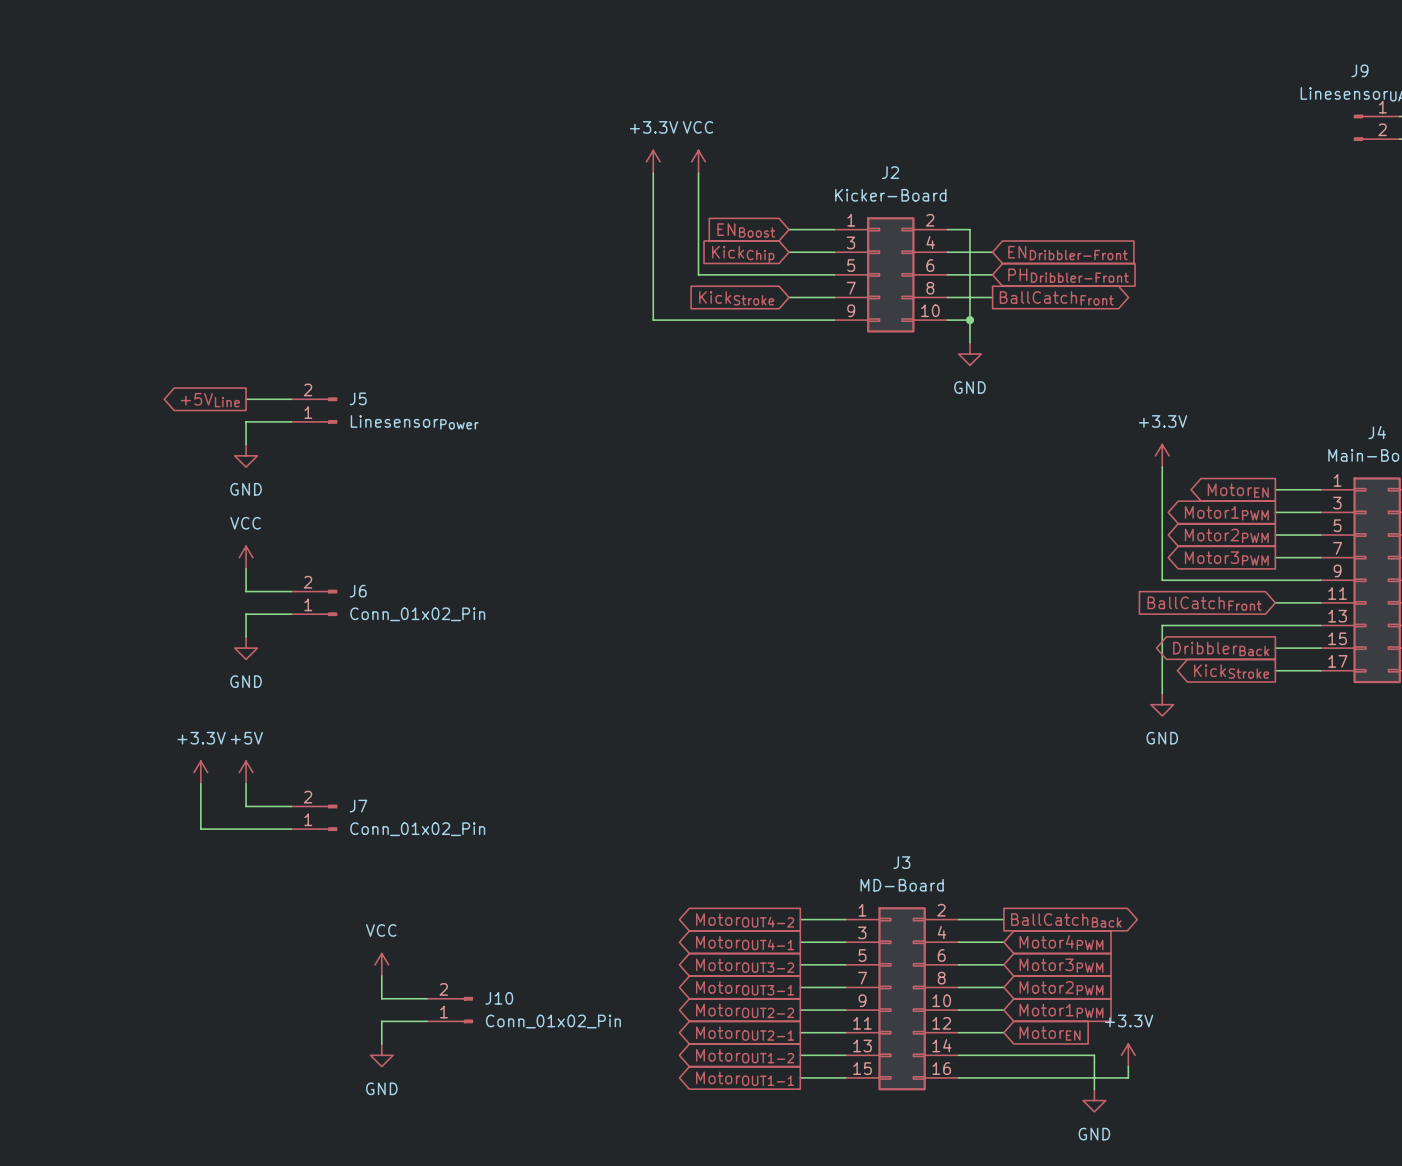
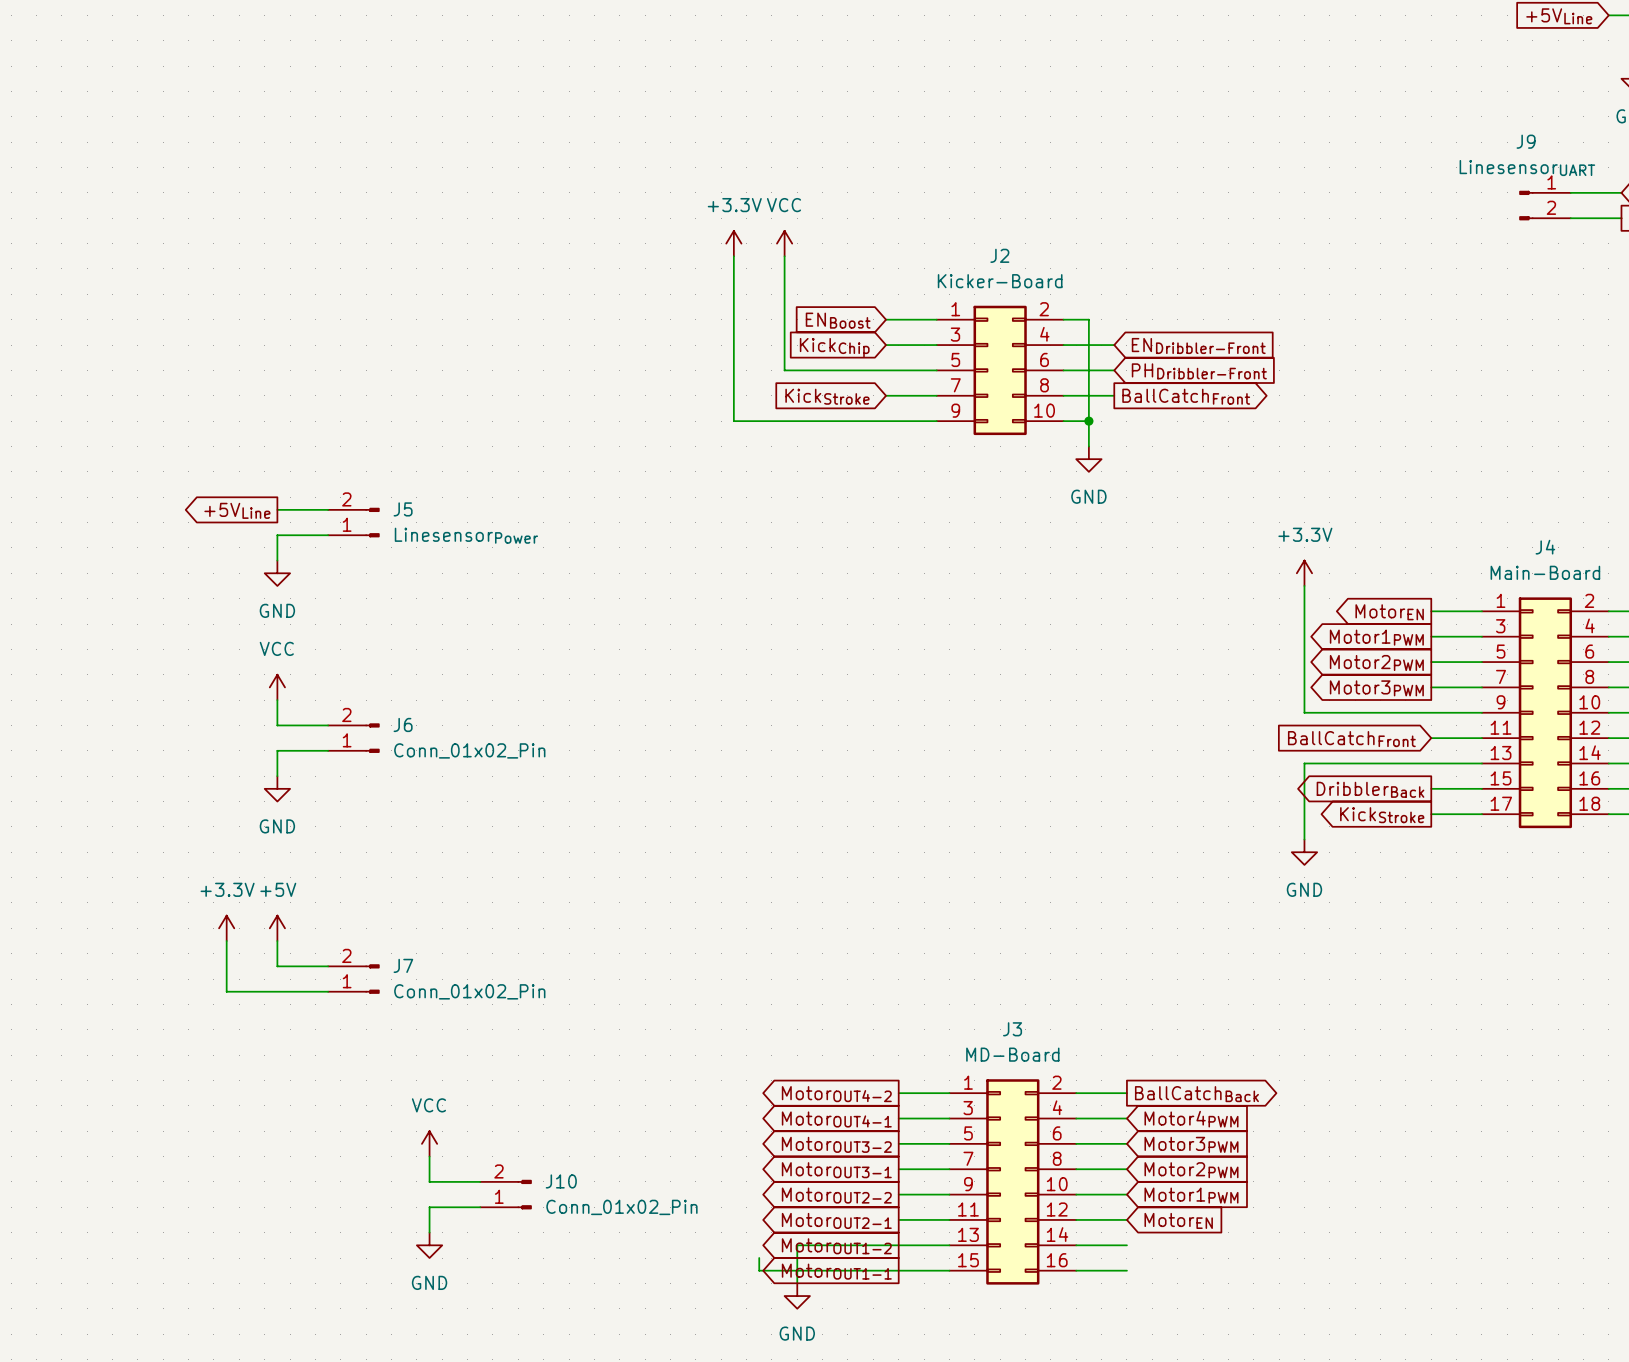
wire: none -> (898, 1245) (797, 1245) (797, 1283)
wire: (1003, 1055) (1094, 1055) (1094, 1089) -> none
power symbol: +3.3V (1128, 1055) -> none
wire: none -> (759, 1258) (759, 1270) (898, 1270)
wire: (1128, 1066) (1128, 1077) (1003, 1077) -> none
power symbol: none -> GND (797, 1296)
power symbol: GND (1094, 1100) -> none

